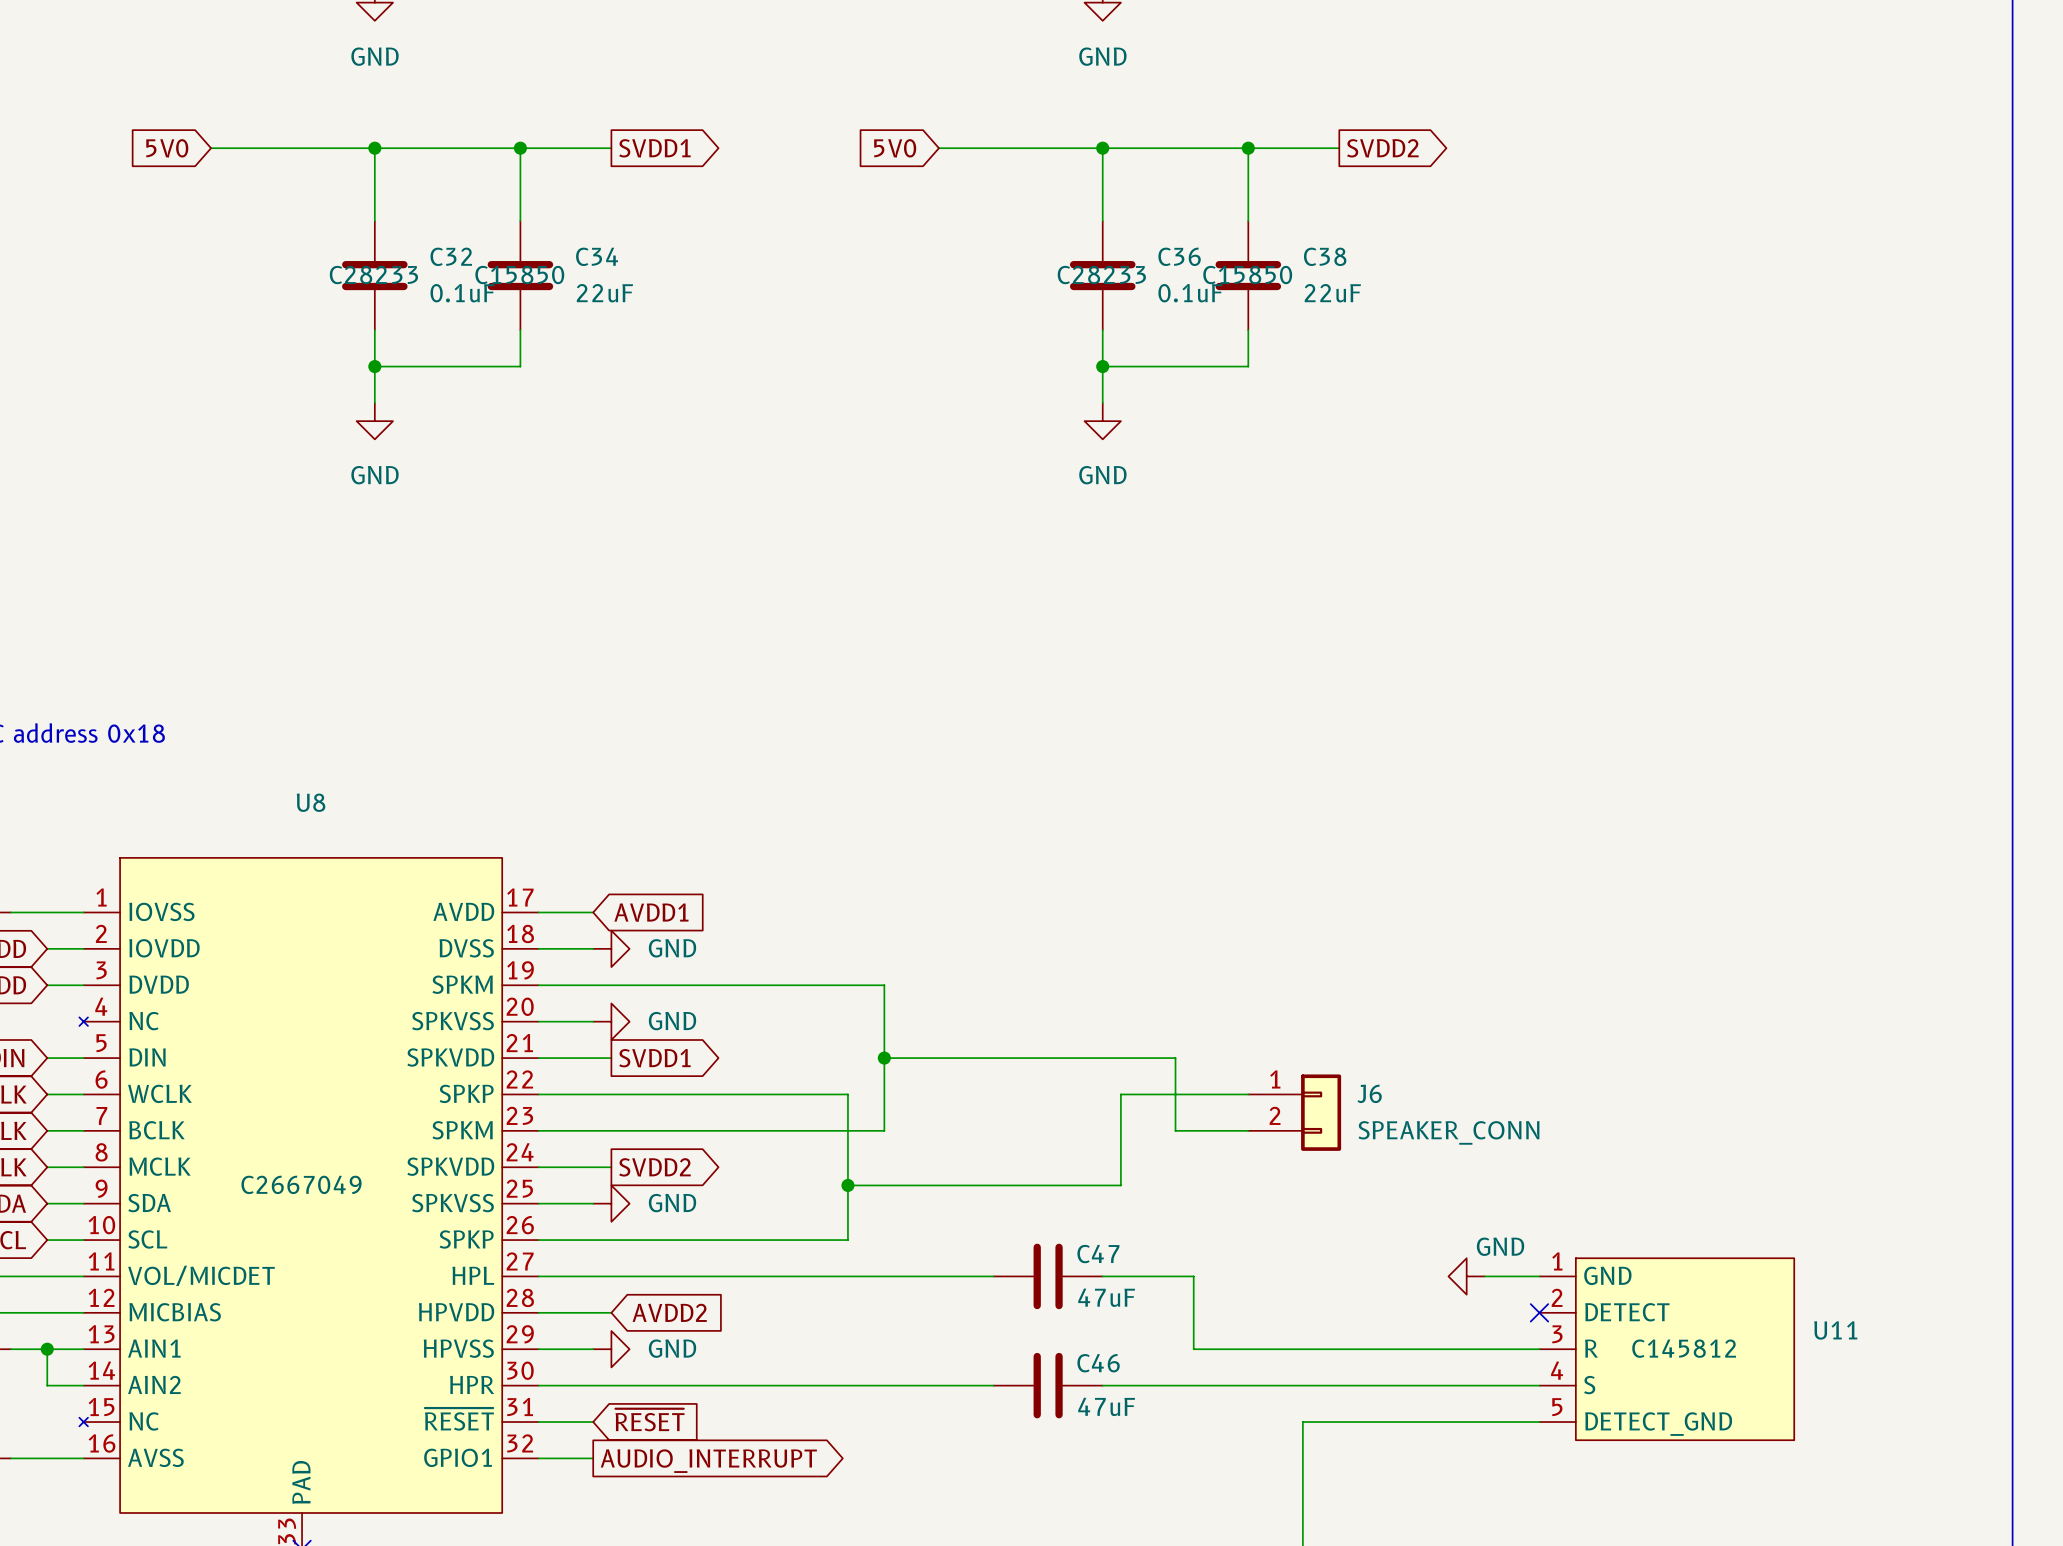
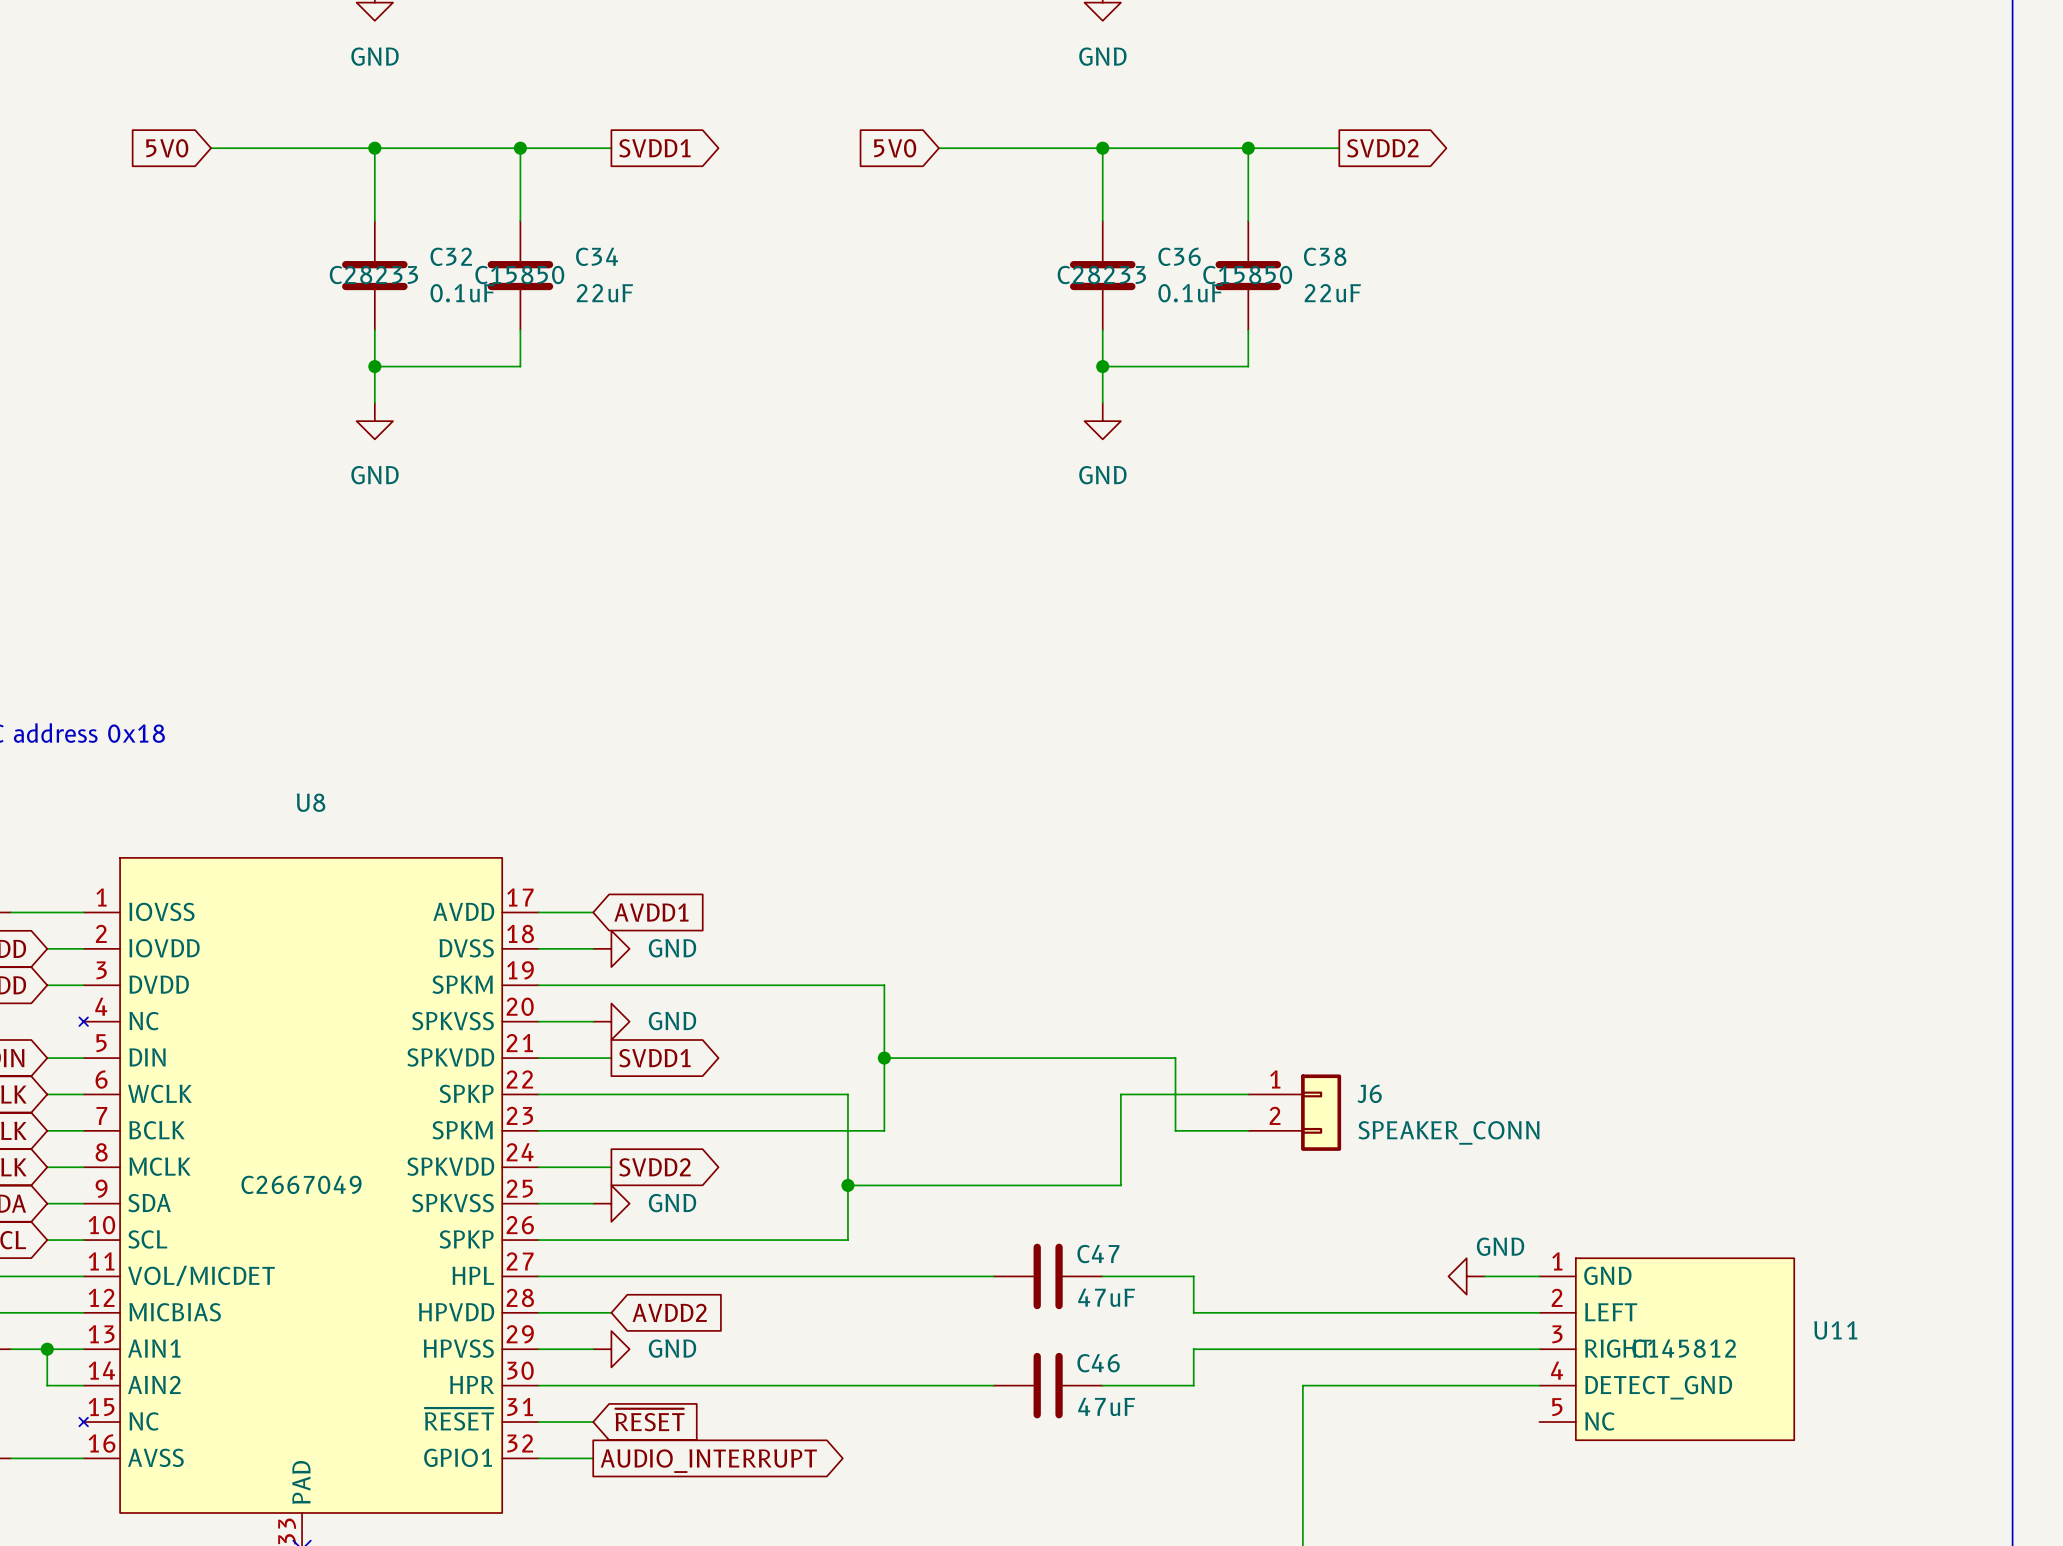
wire: (1193, 1312) (1193, 1349) -> (1193, 1385) (1193, 1349)
wire: none -> (1193, 1312) (1539, 1312)
no-connect mark: (1539, 1312) -> none
U11 pin name: DETECT (1627, 1312) -> LEFT (1611, 1312)
U11 pin name: R (1591, 1348) -> RIGHT (1618, 1348)
wire: (1193, 1385) (1302, 1385) -> (1302, 1422) (1302, 1385)
U11 pin name: S (1589, 1385) -> DETECT_GND (1658, 1387)
wire: (1302, 1422) (1539, 1422) -> none
U11 pin name: DETECT_GND (1658, 1424) -> NC (1599, 1421)

